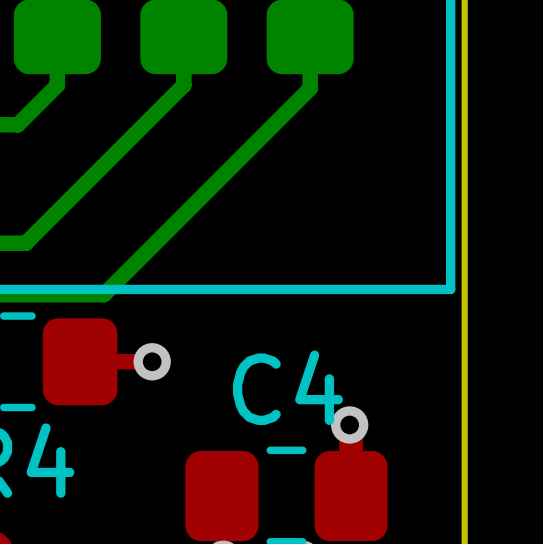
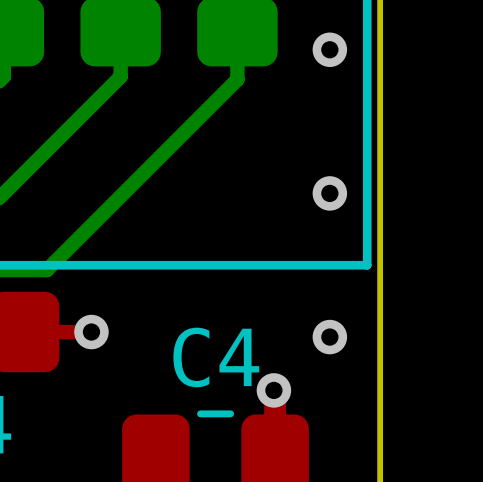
via: none -> (329, 49)
via: none -> (329, 193)
via: none -> (329, 337)

